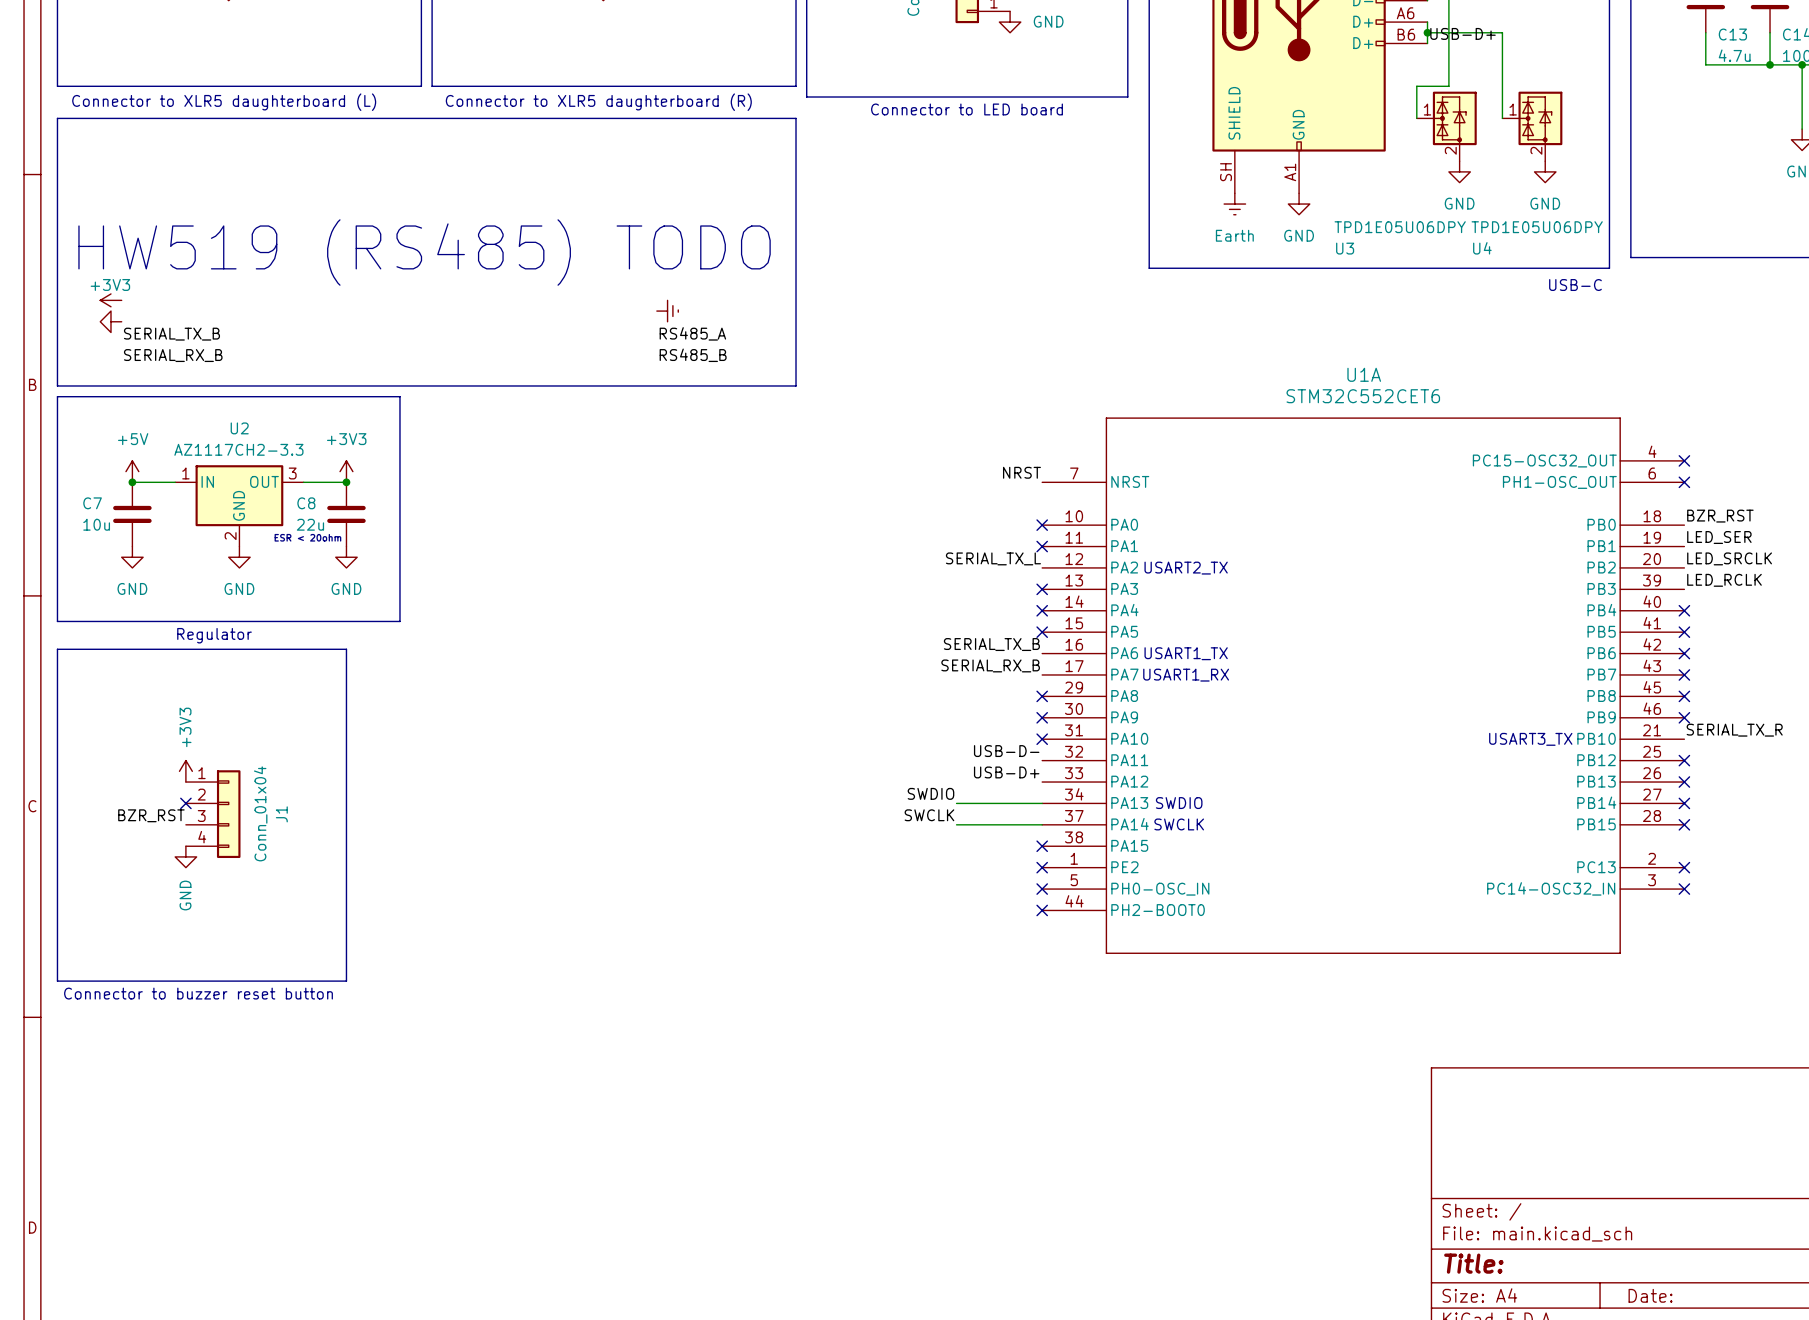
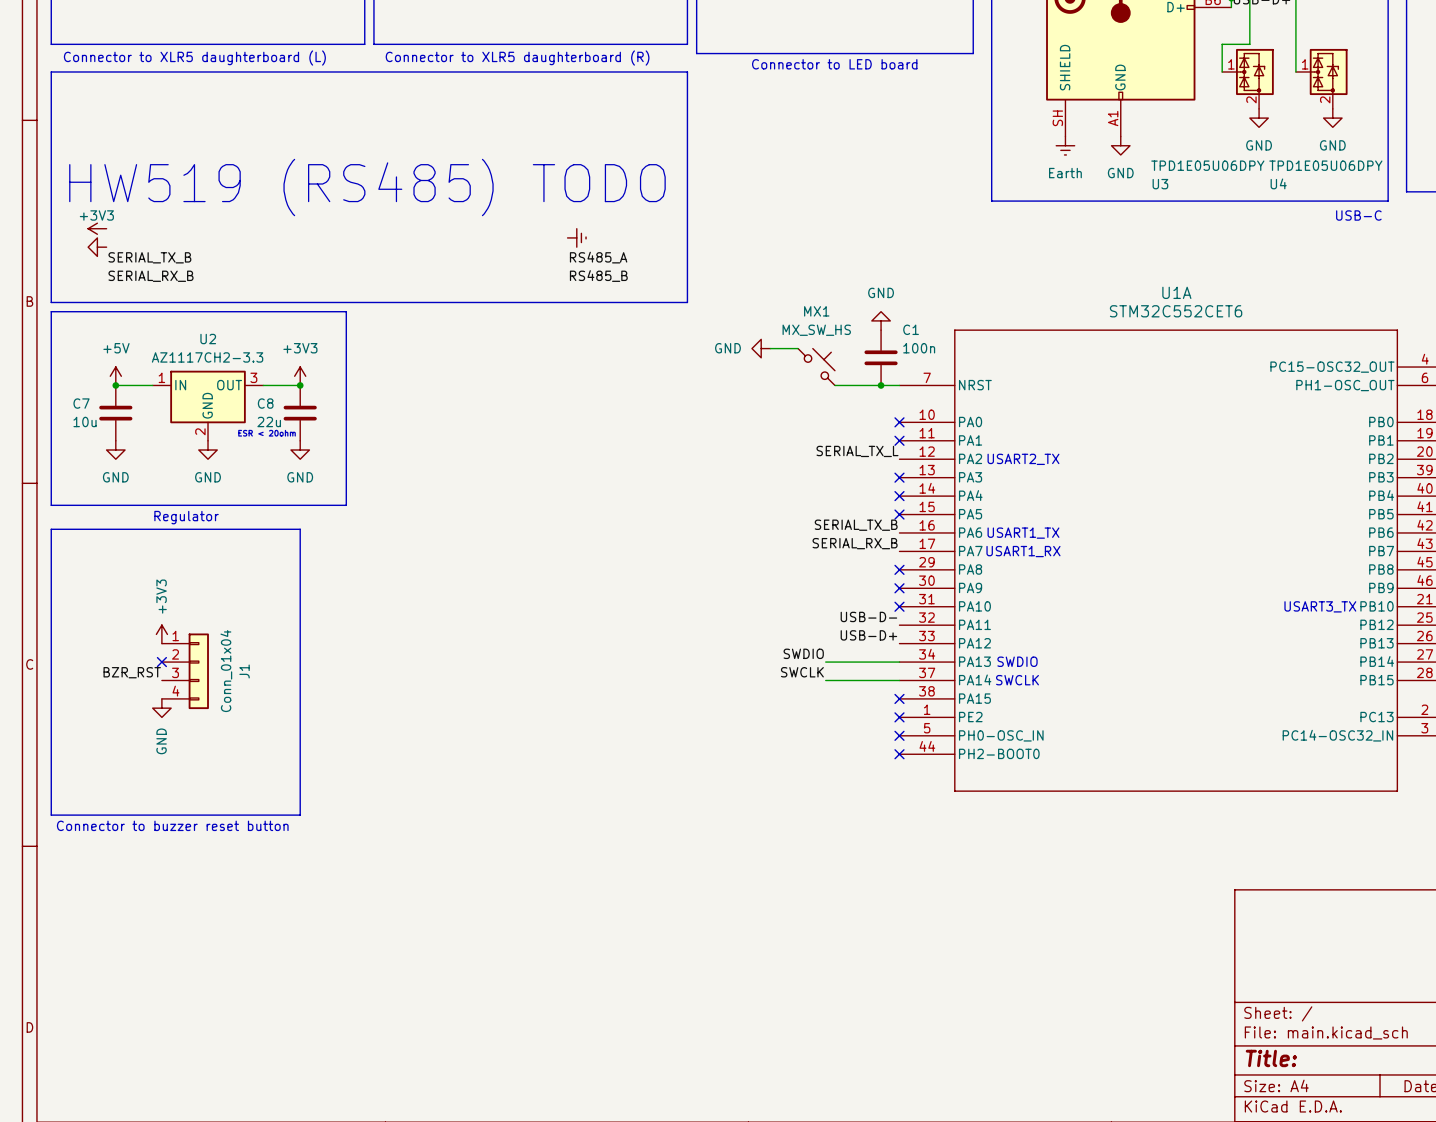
power symbol: none -> GND (881, 320)
power symbol: none -> GND (761, 348)
wire: none -> (770, 348) (798, 348)
C1: none -> 100n (881, 357)
MX1: none -> MX_SW_HS (816, 367)
label: NRST (1021, 472) -> none
wire: none -> (834, 385) (899, 385)
junction: none -> (881, 385)

